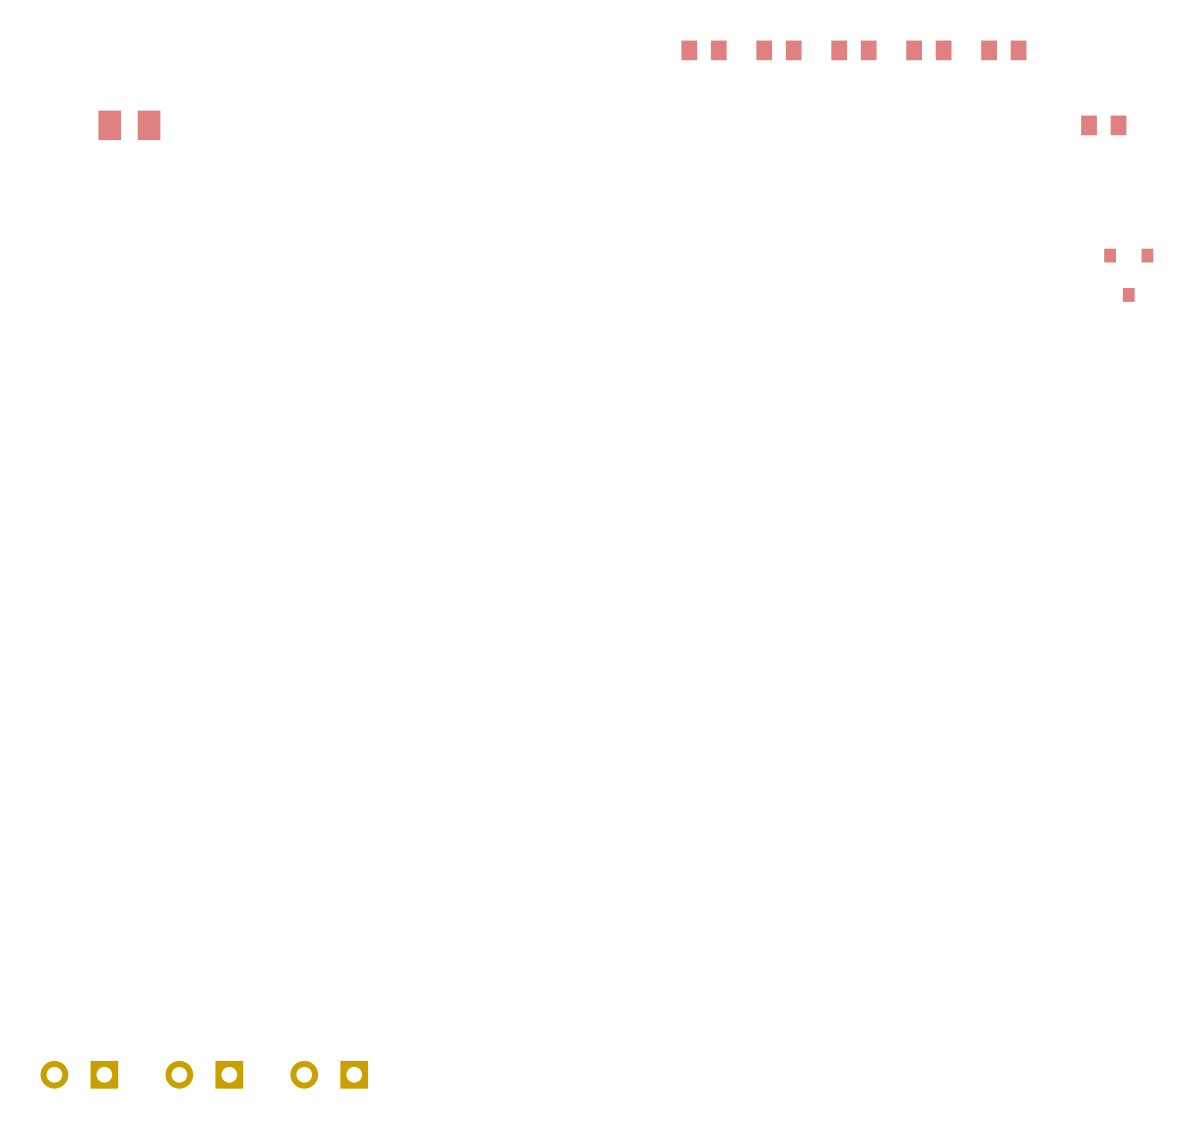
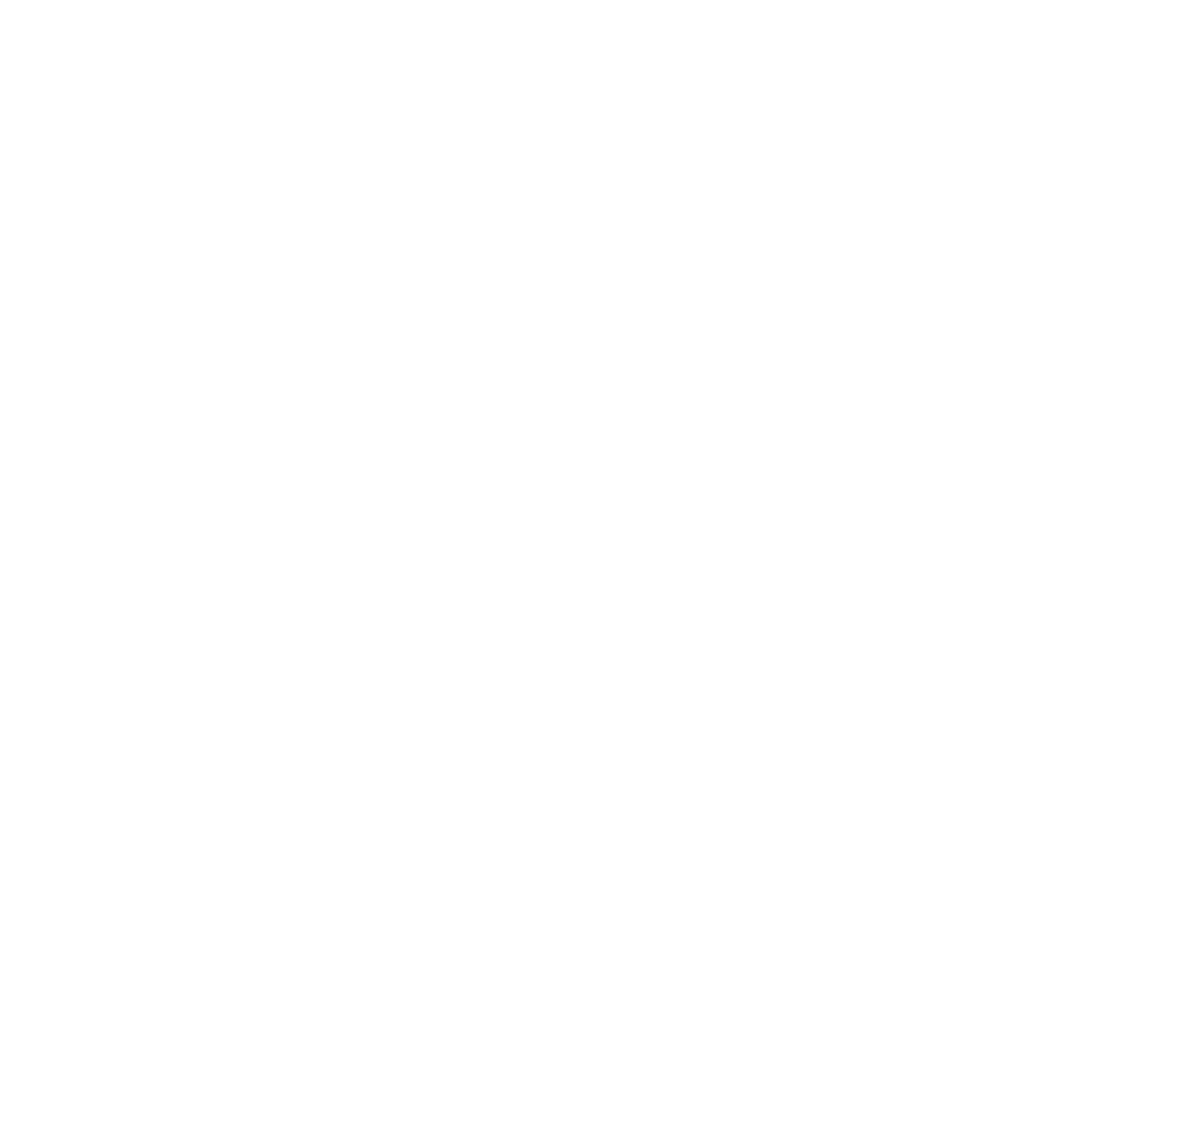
part: (704, 50) -> none
part: (778, 50) -> none
part: (853, 50) -> none
part: (928, 50) -> none
part: (1003, 50) -> none
part: (129, 125) -> none
part: (1103, 125) -> none
part: (1128, 275) -> none
part: (79, 1074) -> none
part: (204, 1074) -> none
part: (329, 1074) -> none

